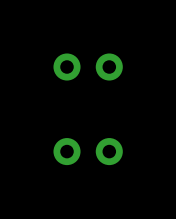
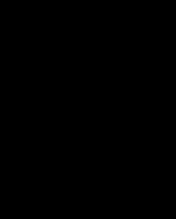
part: (88, 67) -> none
part: (88, 151) -> none

